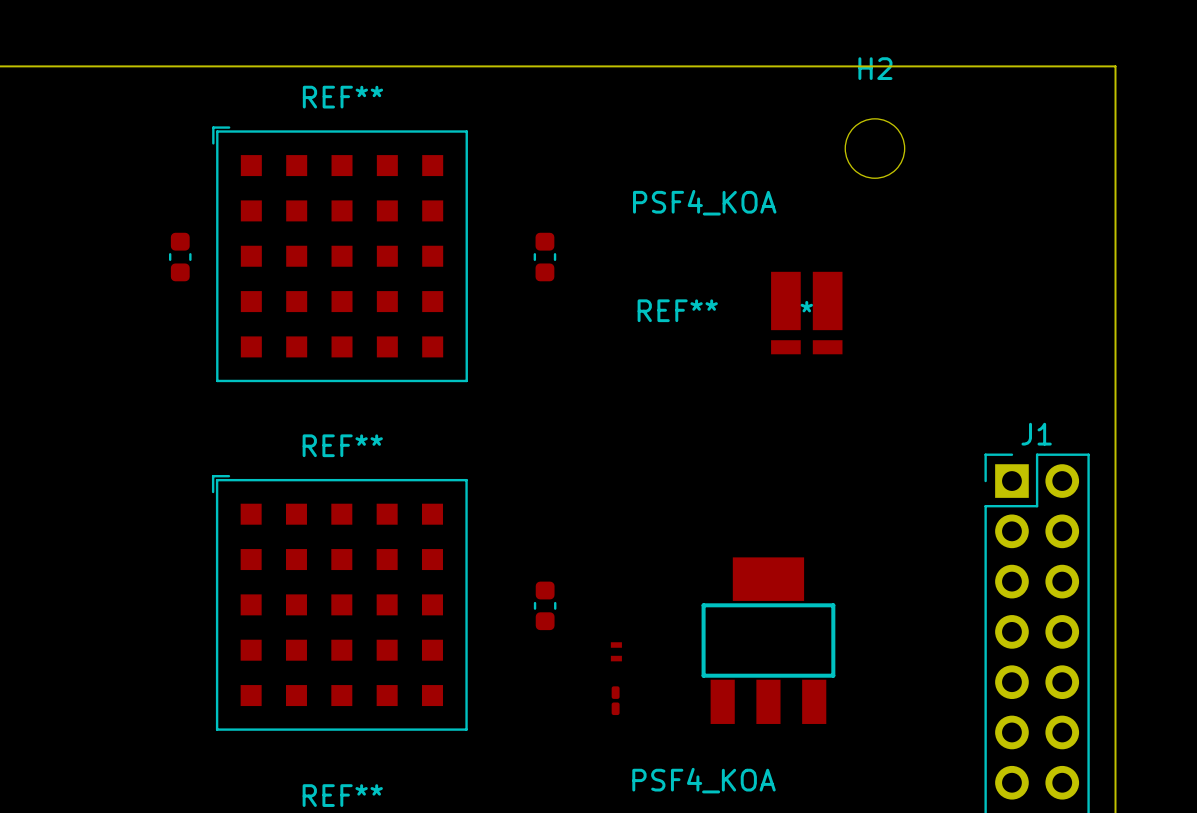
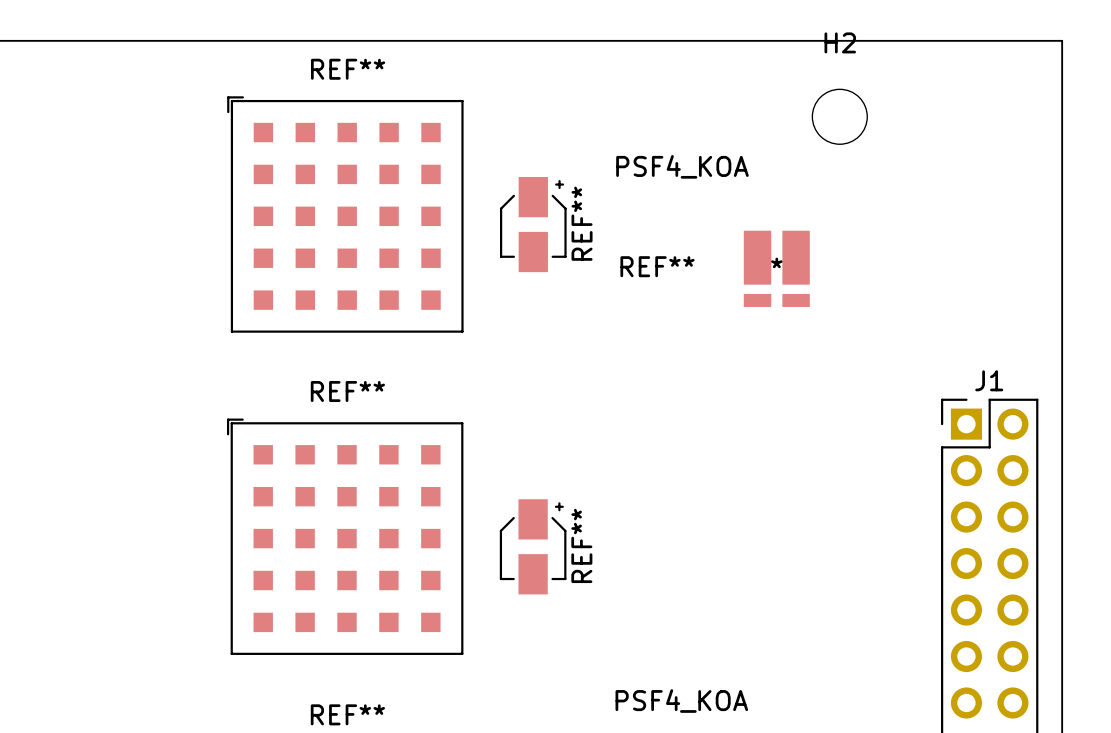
part: (180, 257) -> none
part: (544, 257) -> none
REF**: none -> (533, 224)
part: (545, 605) -> none
REF**: none -> (533, 546)
part: (768, 640) -> none
part: (616, 651) -> none
part: (615, 700) -> none

